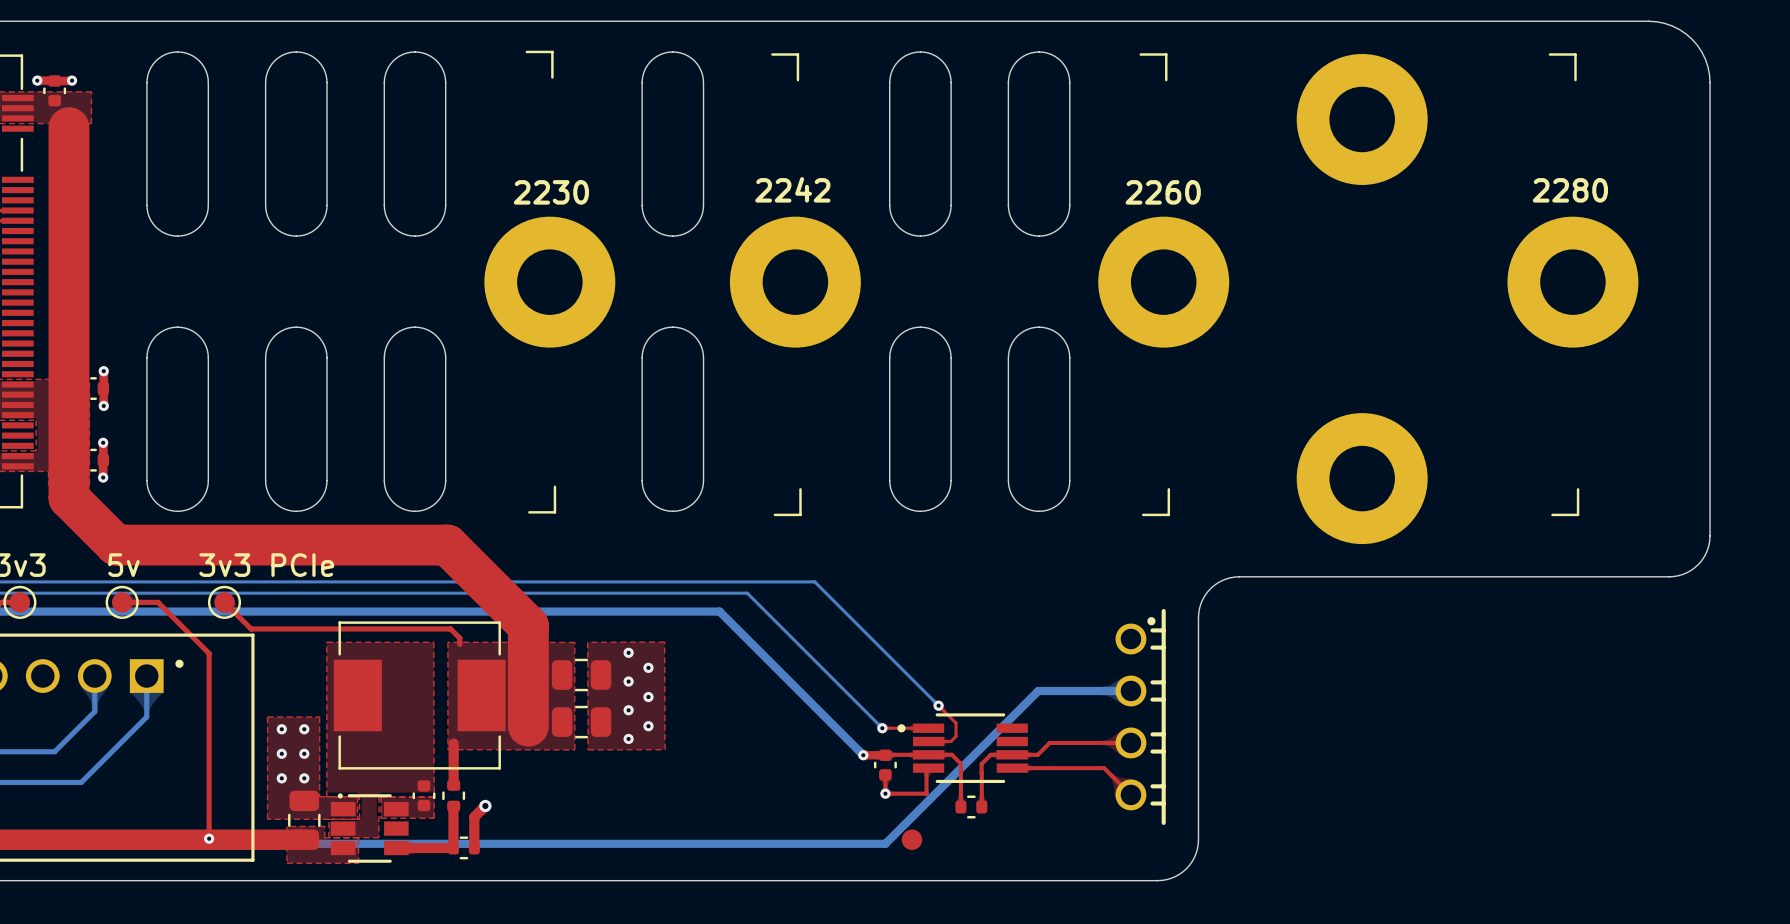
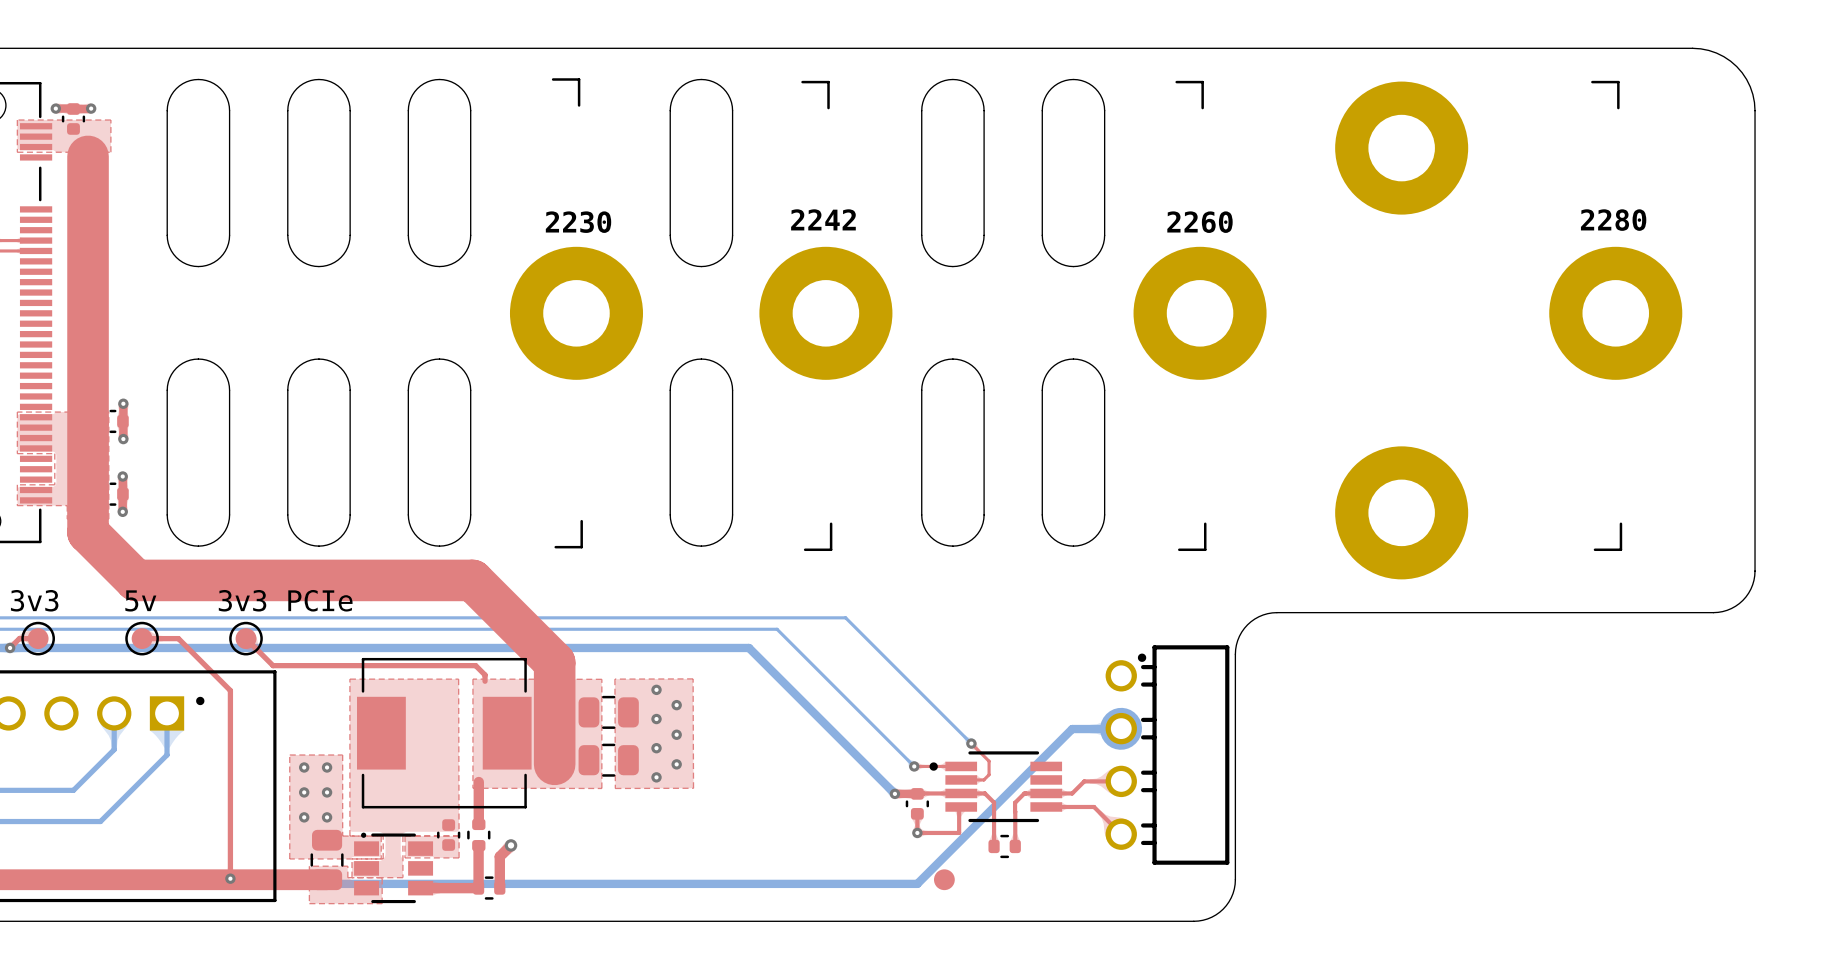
part footprint: [1115, 608, 1166, 826] -> [1105, 645, 1230, 865]
bottom track: (1130, 690) (1037, 691) -> (1121, 728) (1072, 729)
top track: (1086, 742) (1130, 742) -> none
top track: (1059, 768) (1104, 768) (1130, 794) -> (1094, 806) (1121, 834)

